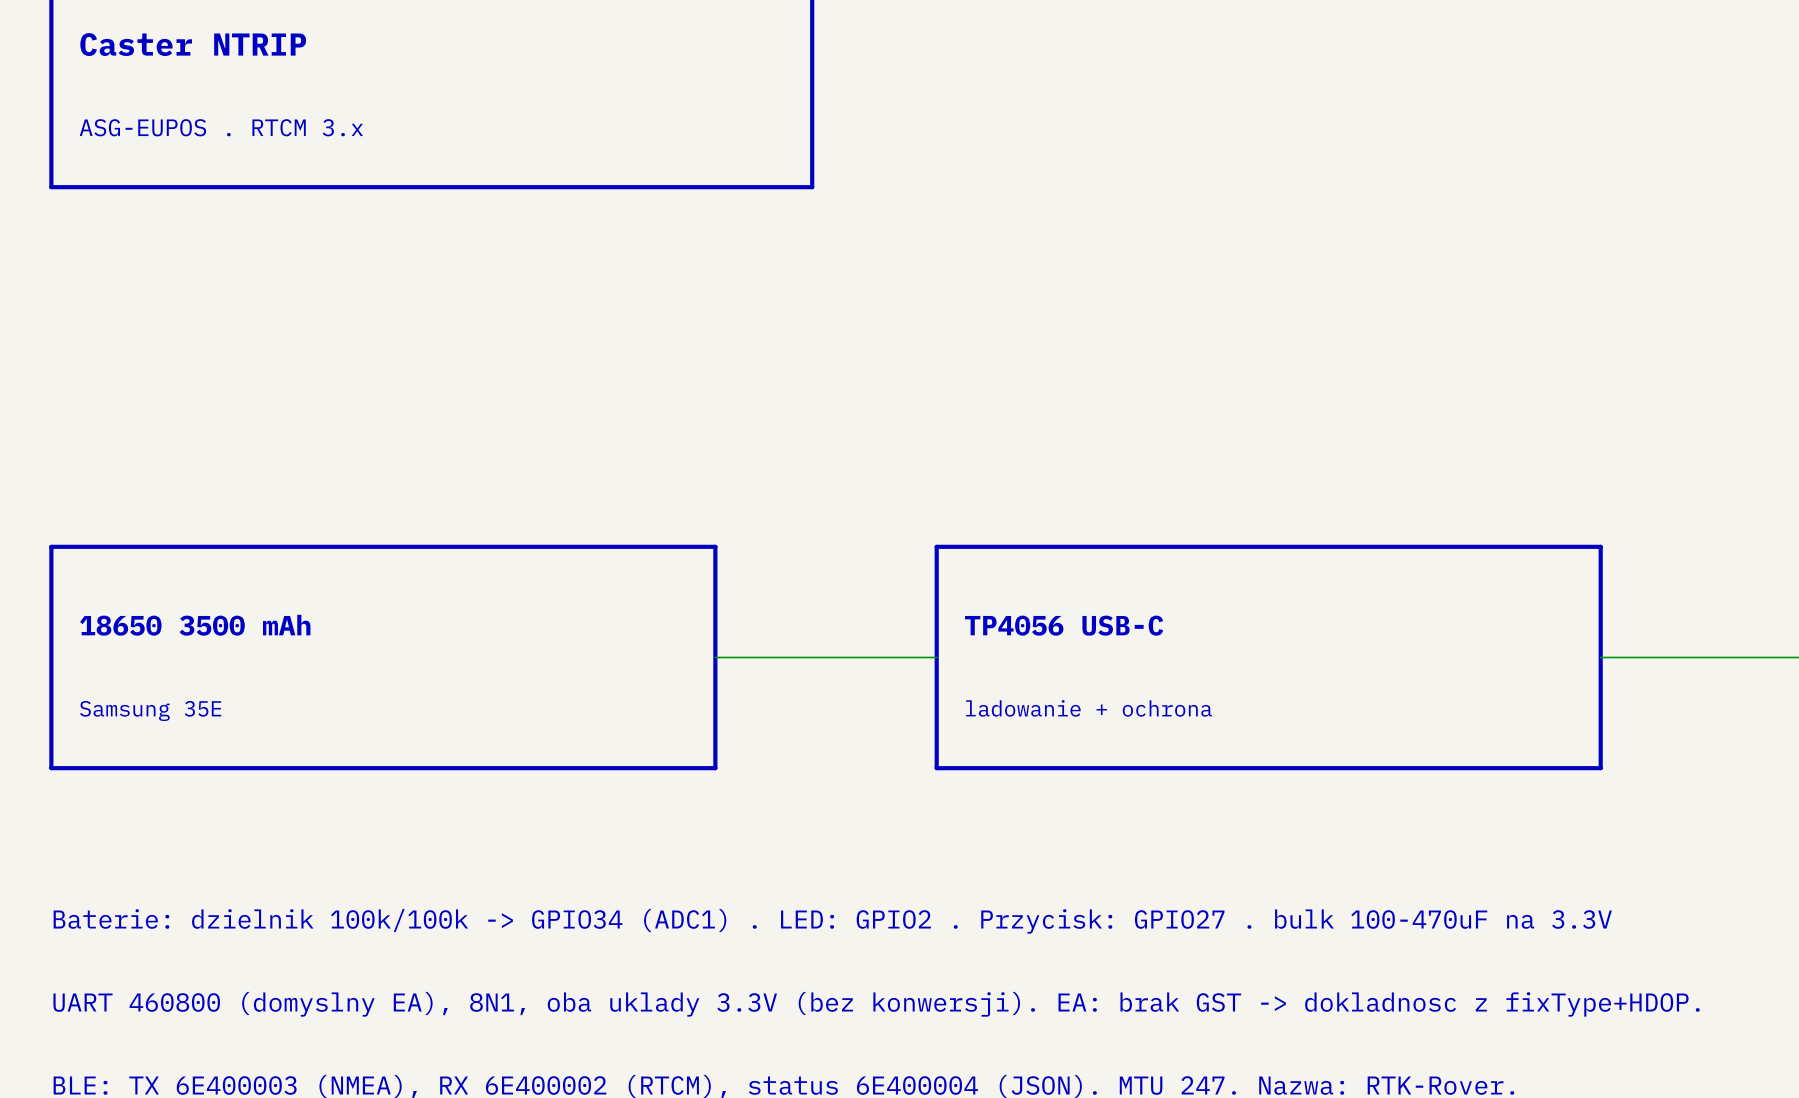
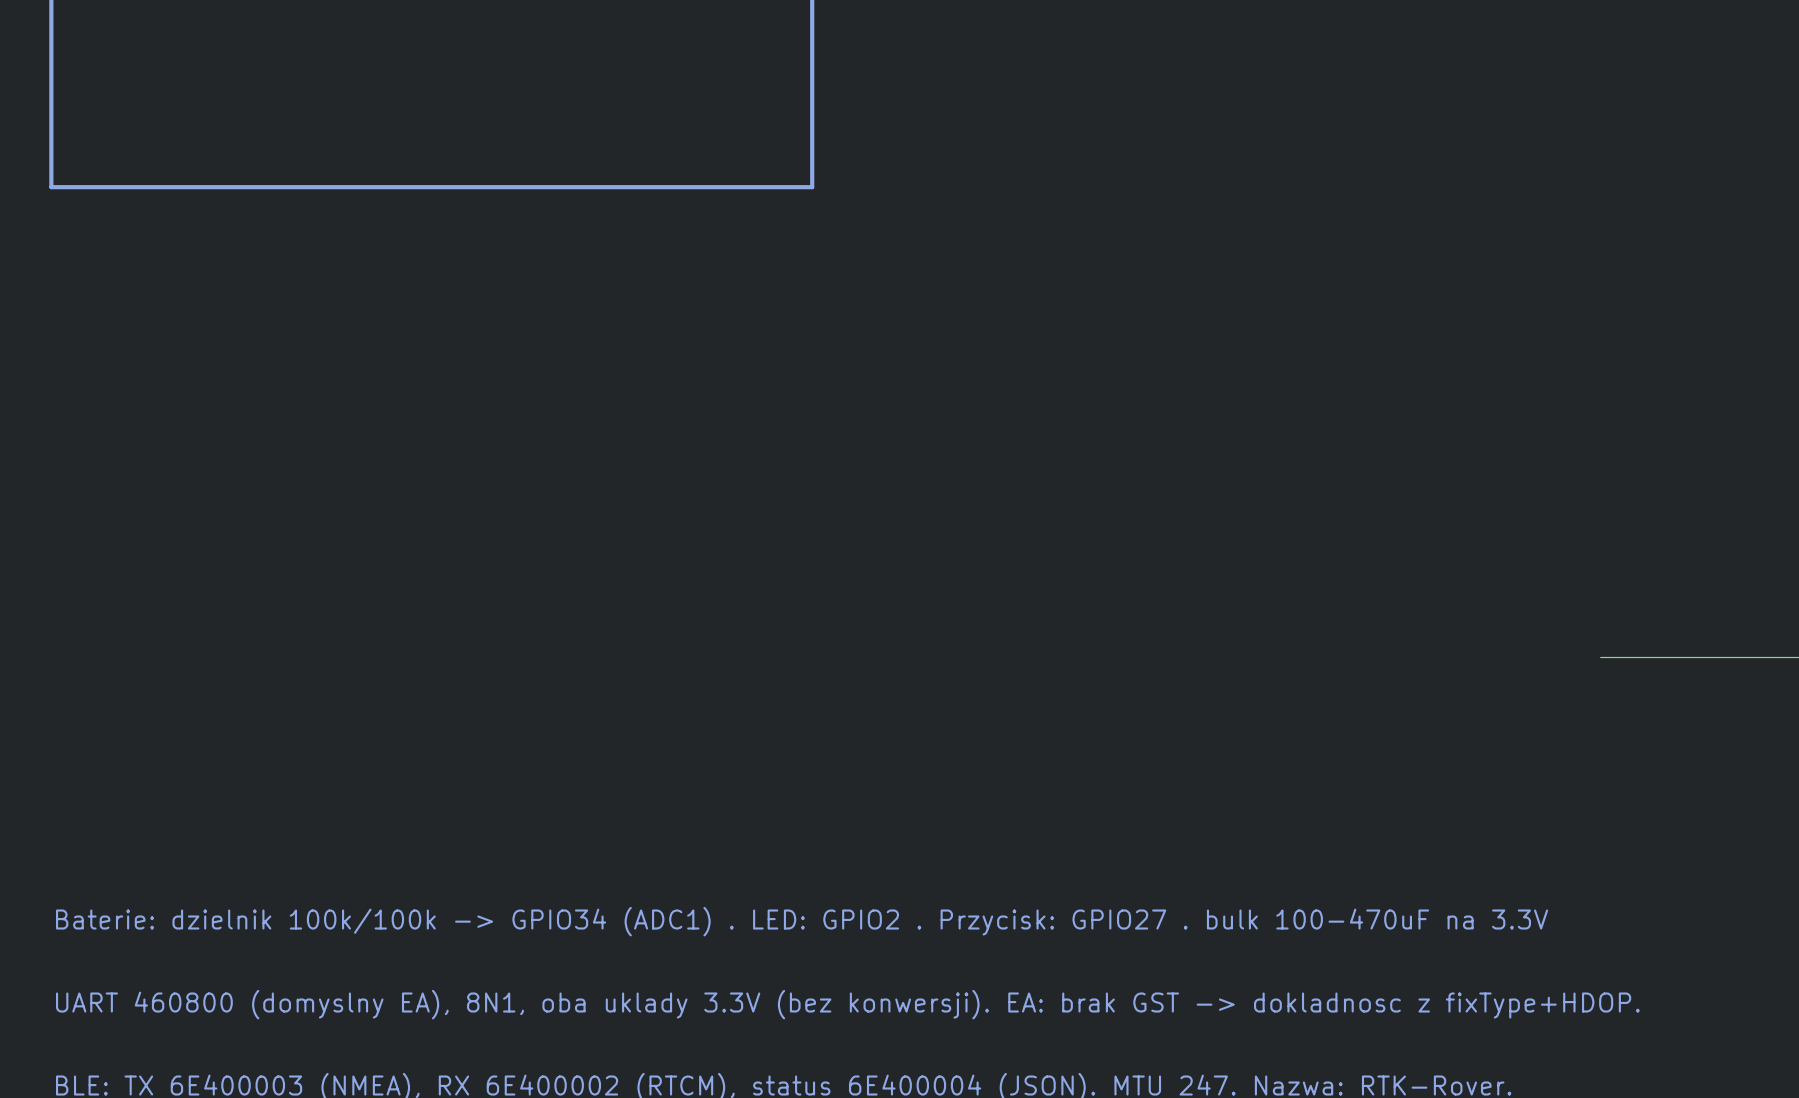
text: Caster NTRIP (193, 44) -> none
text: ASG-EUPOS . RTCM 3.x (221, 127) -> none
line: (51, 546) (51, 768) (715, 768) (715, 546) (51, 546) -> none
line: (936, 546) (1600, 546) (1600, 768) (936, 768) (936, 546) -> none
text: 18650 3500 mAh (195, 625) -> none
text: TP4056 USB-C (1064, 625) -> none
wire: (715, 657) (936, 657) -> none
text: ladowanie + ochrona (1088, 708) -> none
text: Samsung 35E (150, 710) -> none

